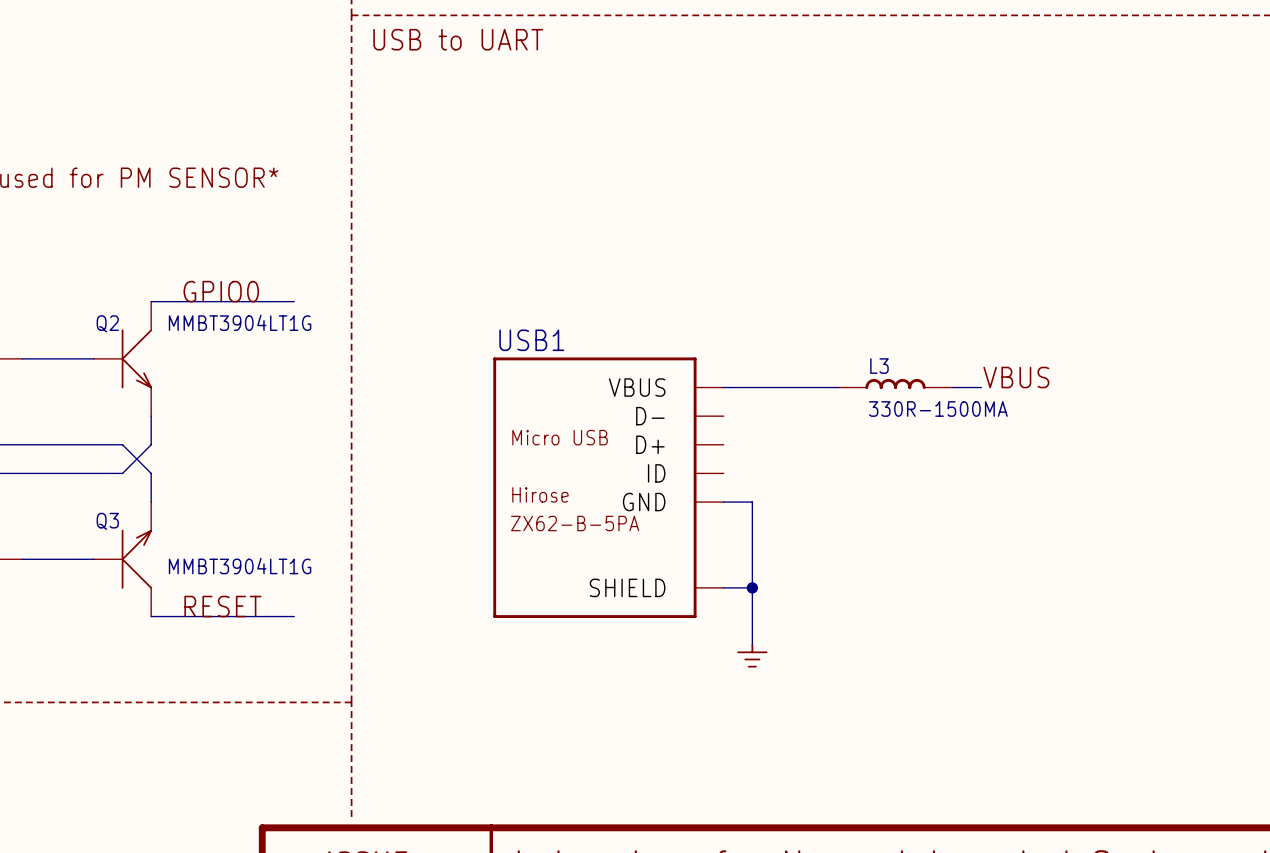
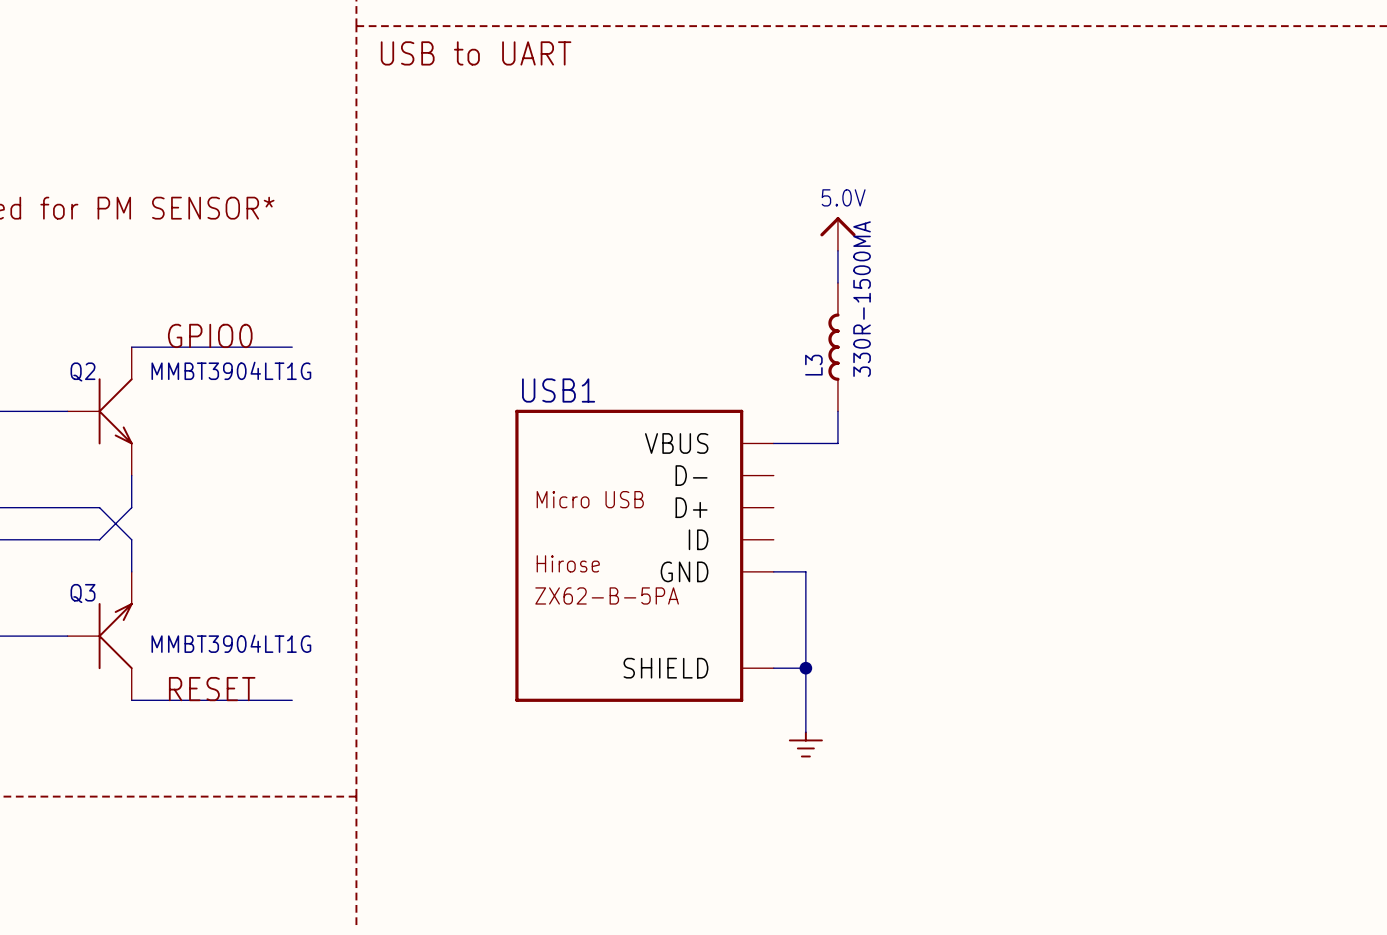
power symbol: none -> 5.0V (837, 233)
wire: none -> (837, 250) (837, 282)
label: VBUS (1016, 377) -> none
L3 rotation: 0° (895, 383) -> 90° counterclockwise (833, 347)
L3 position: (895, 383) -> (833, 347)
wire: (780, 387) (838, 387) -> (837, 443) (837, 411)
wire: (952, 387) (981, 387) -> none

